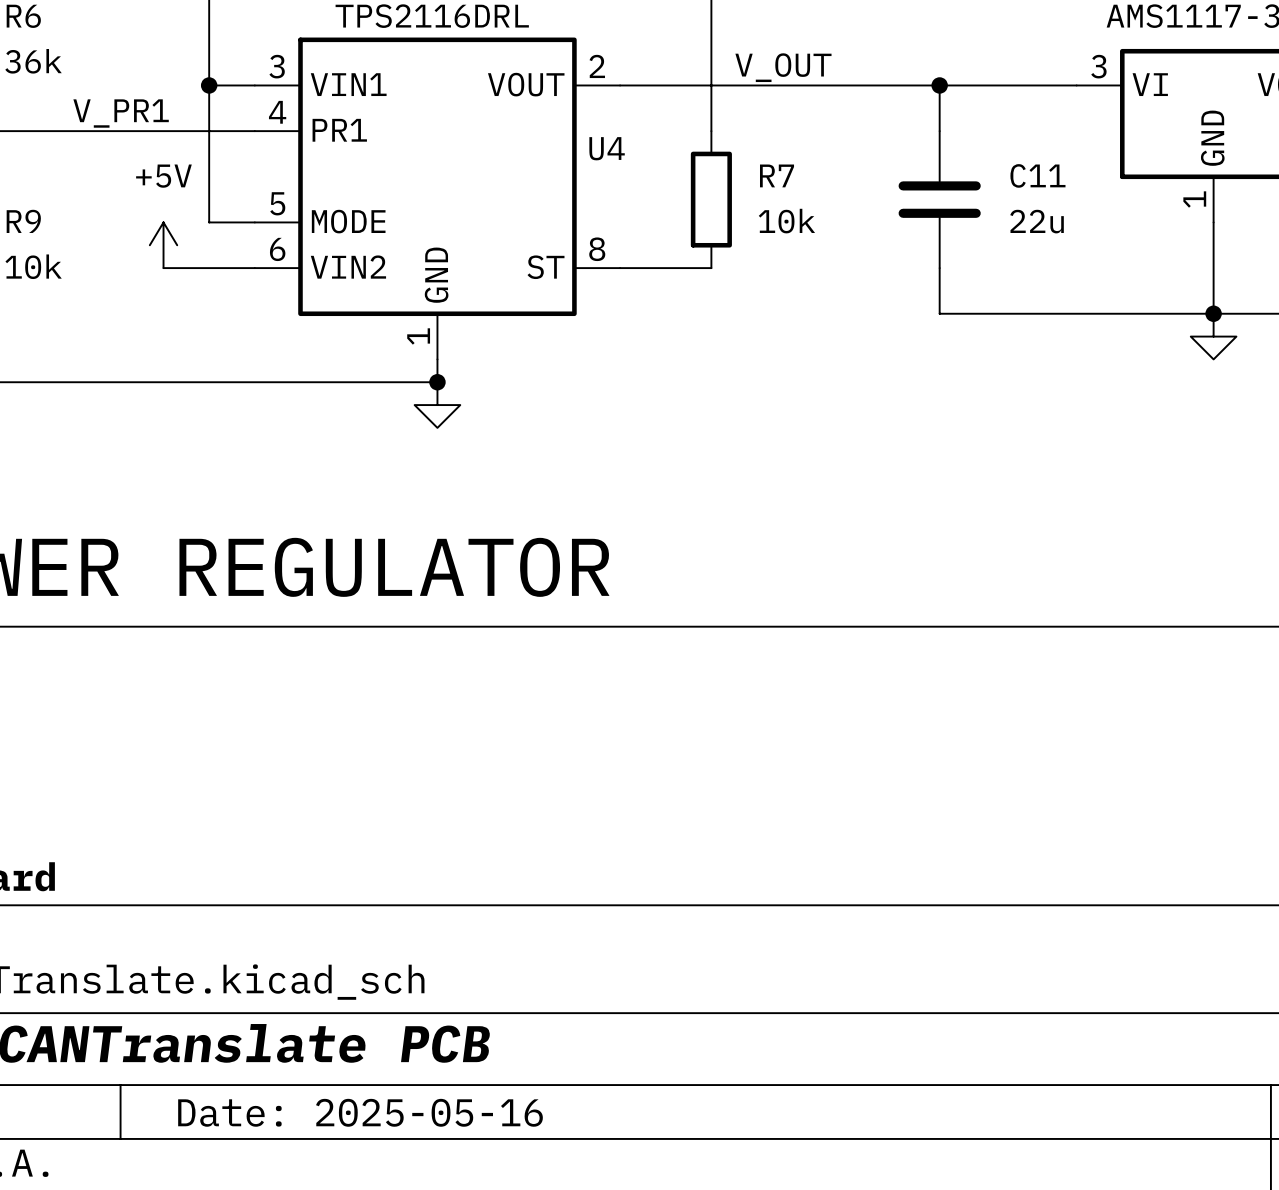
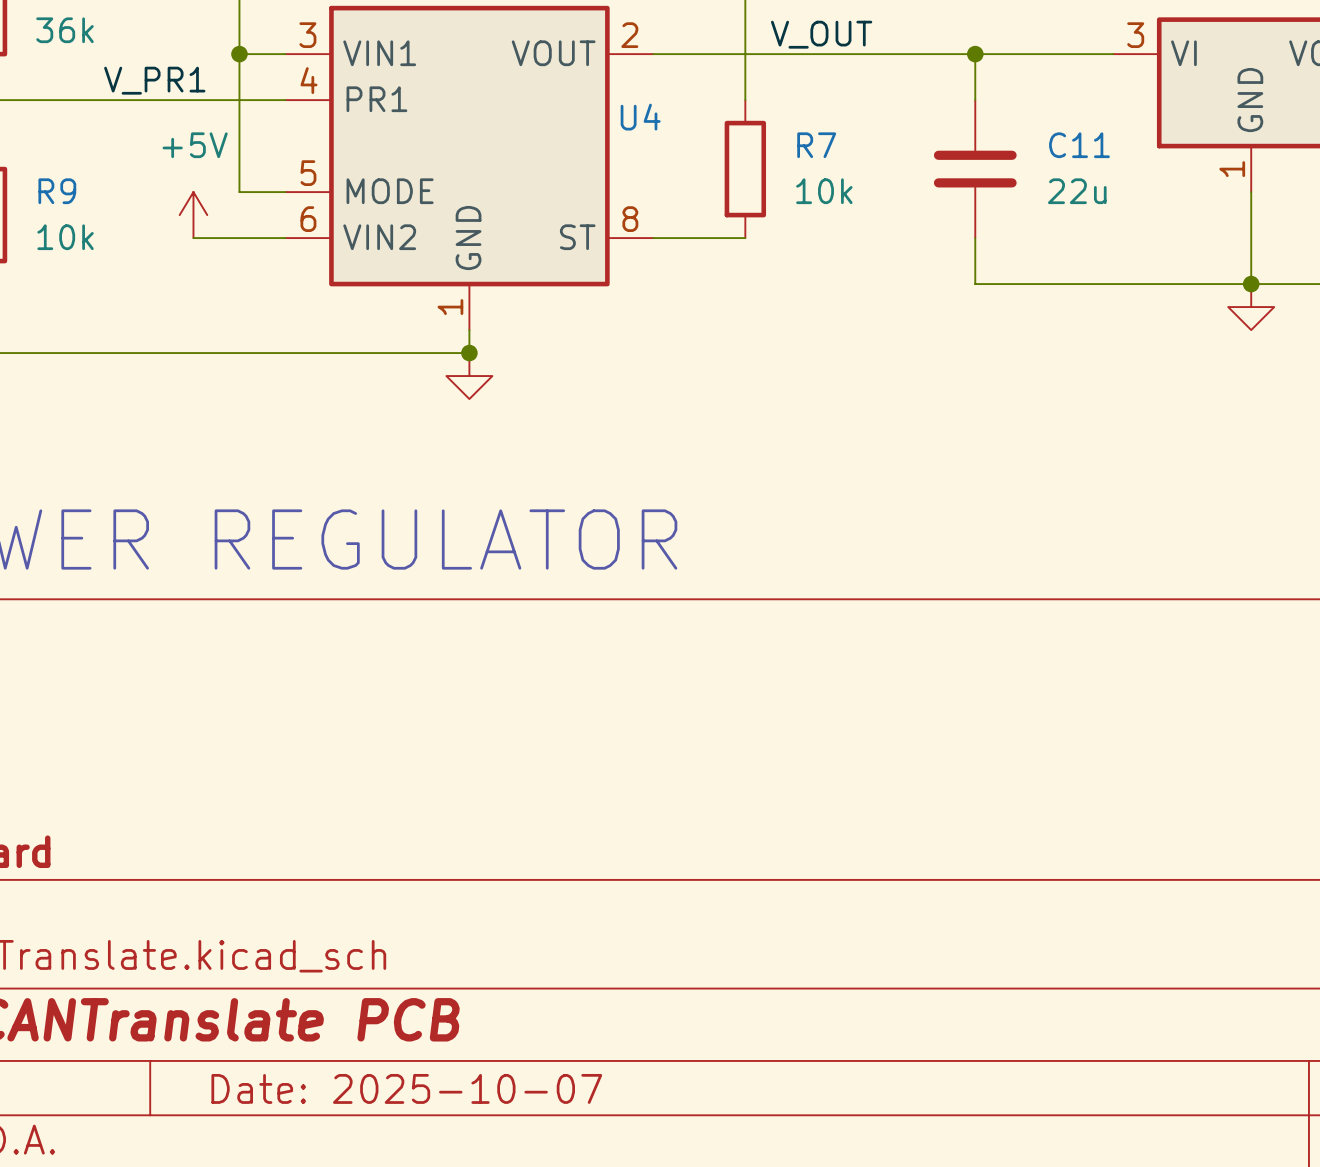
title block: Date: 2025-05-16 (360, 1112) -> Date: 2025-10-07 (406, 1088)

